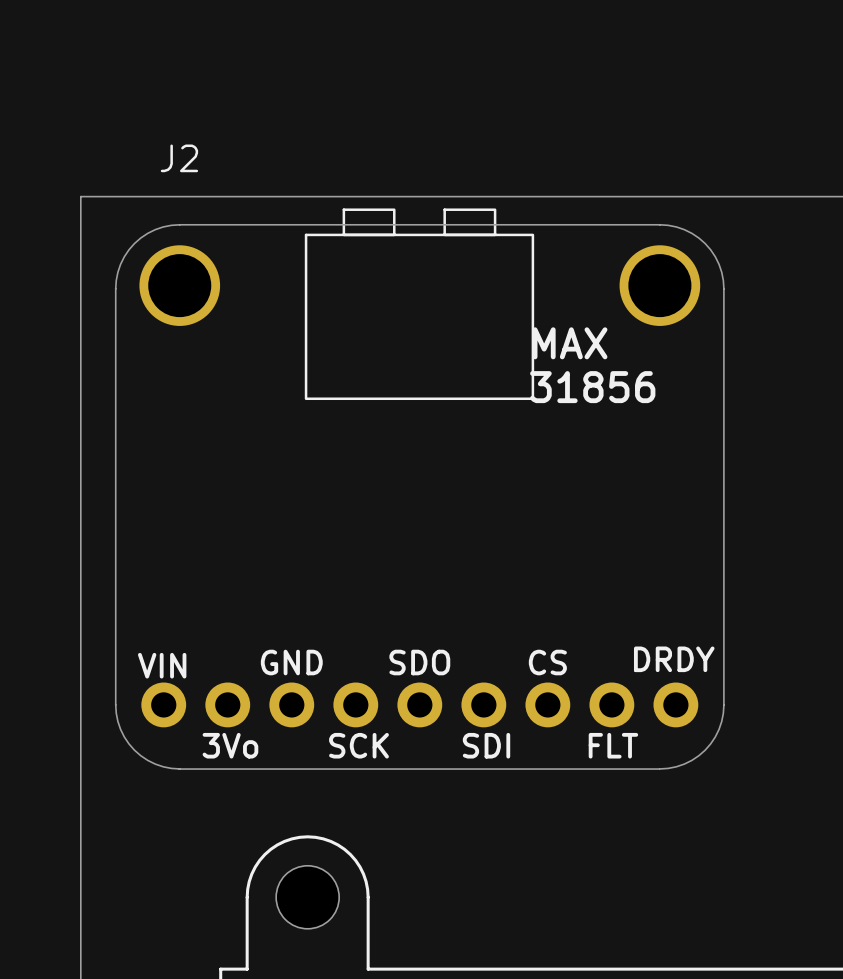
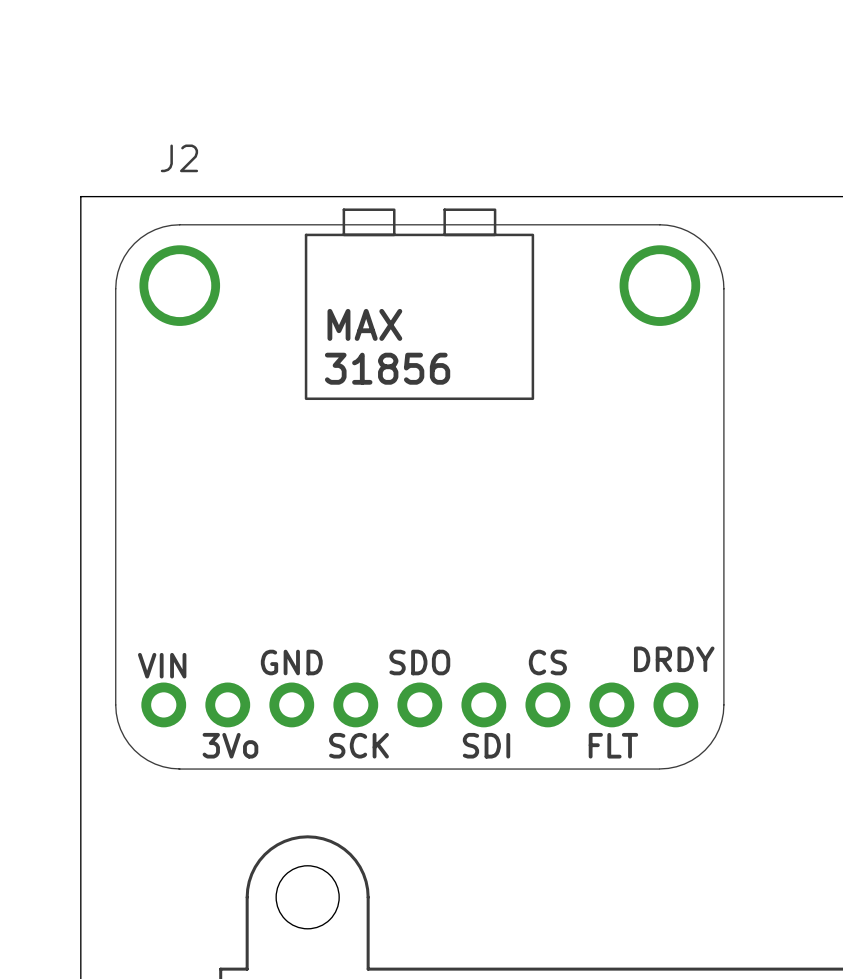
J2 footprint: [115, 208, 725, 770] -> [115, 208, 725, 770]

